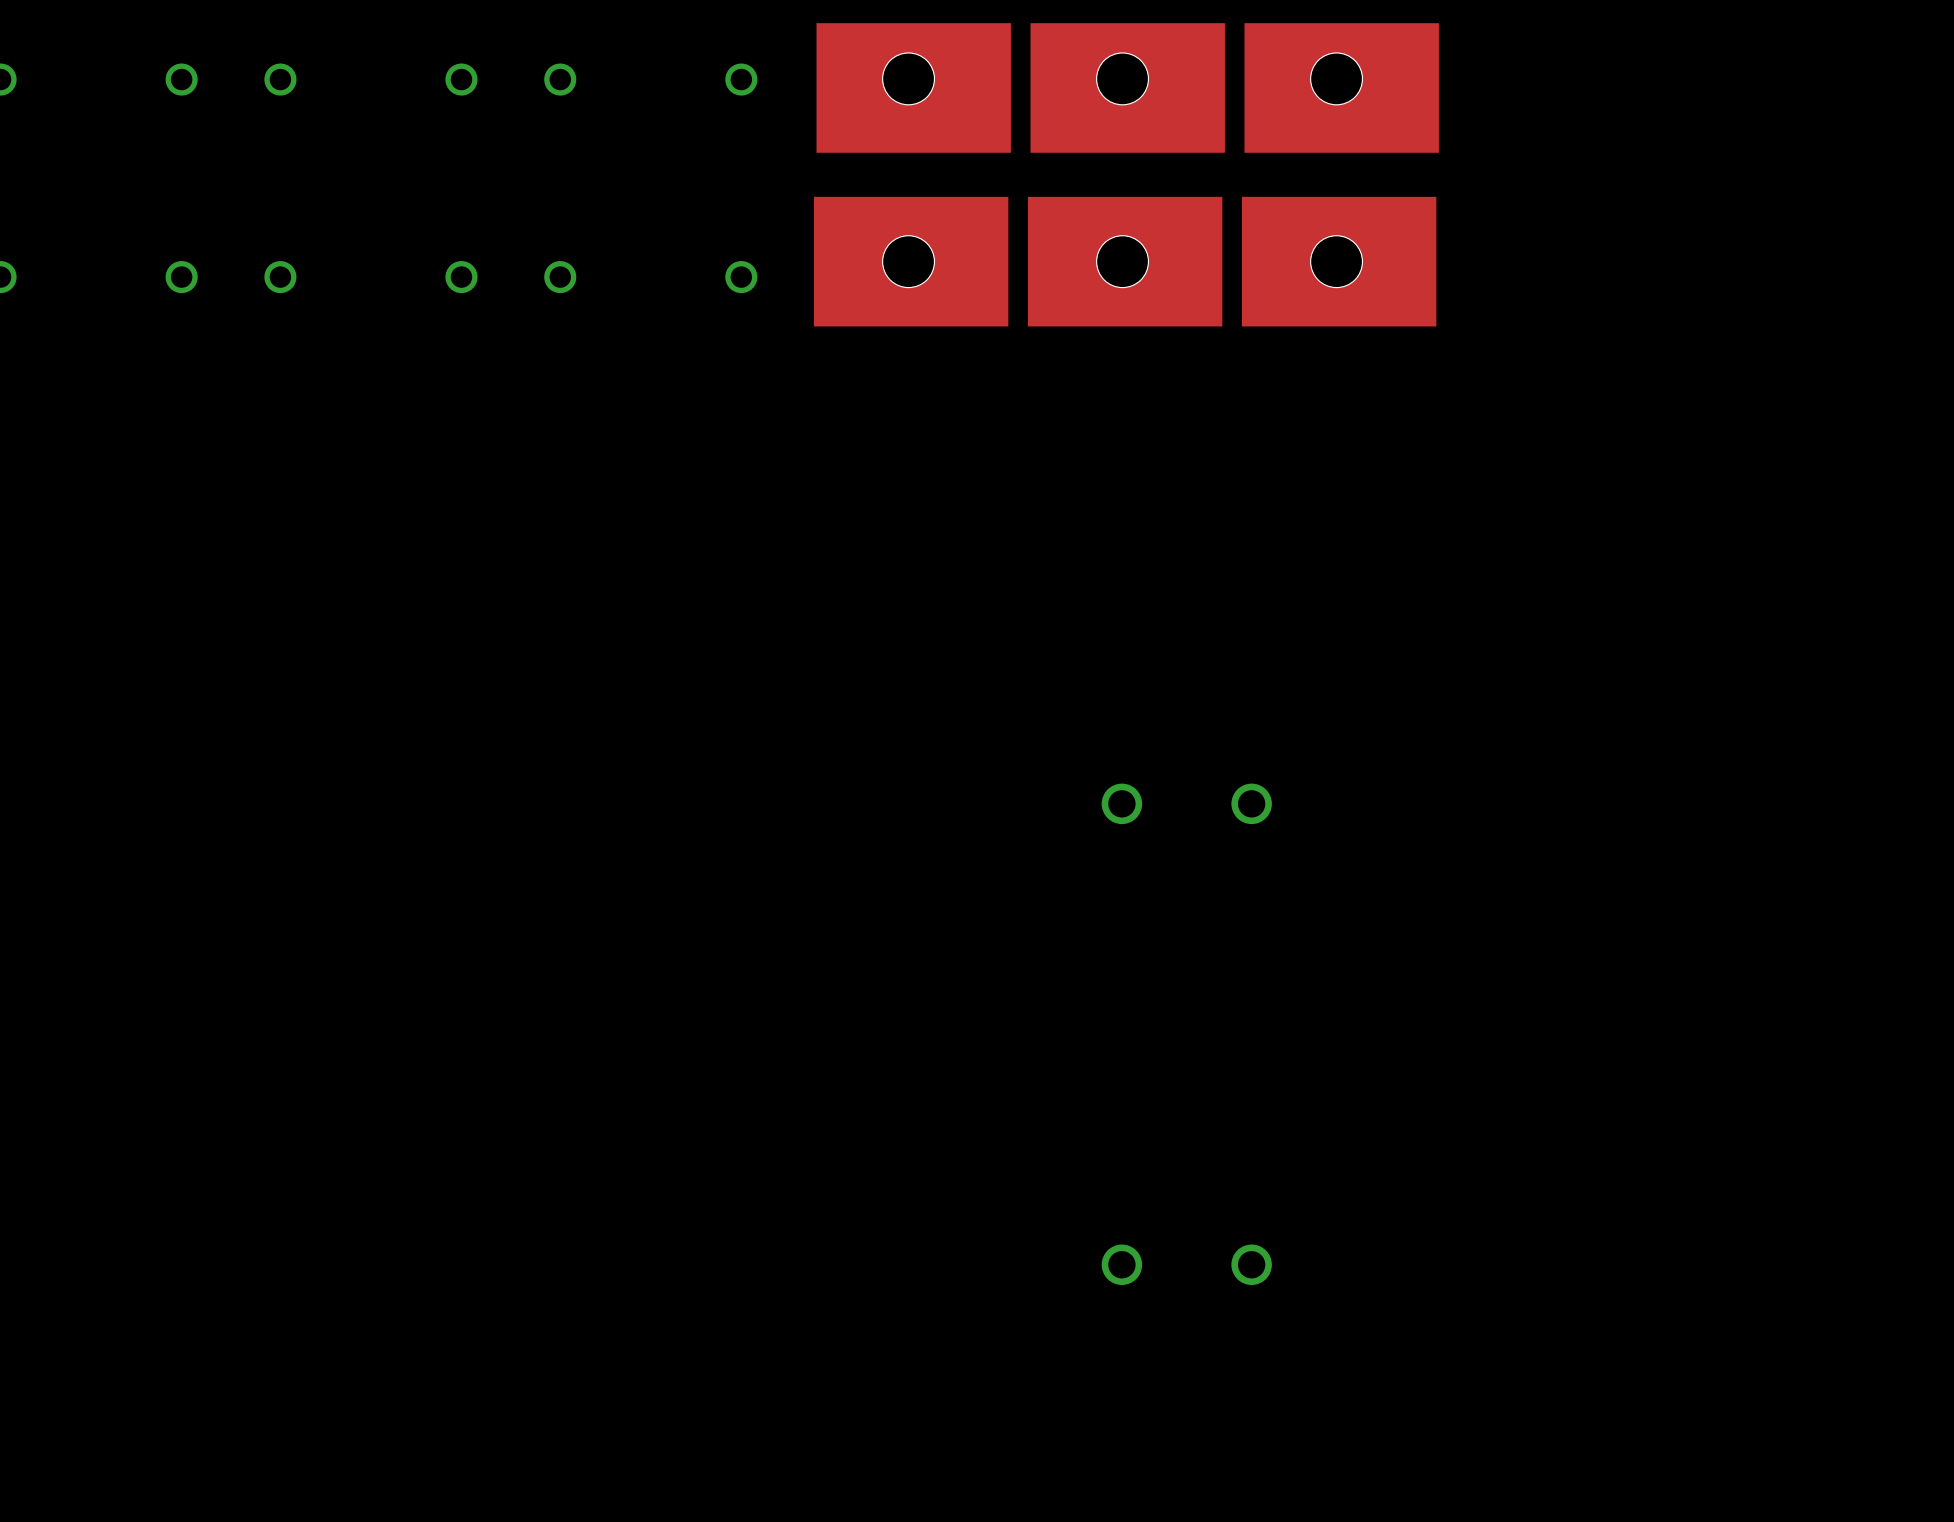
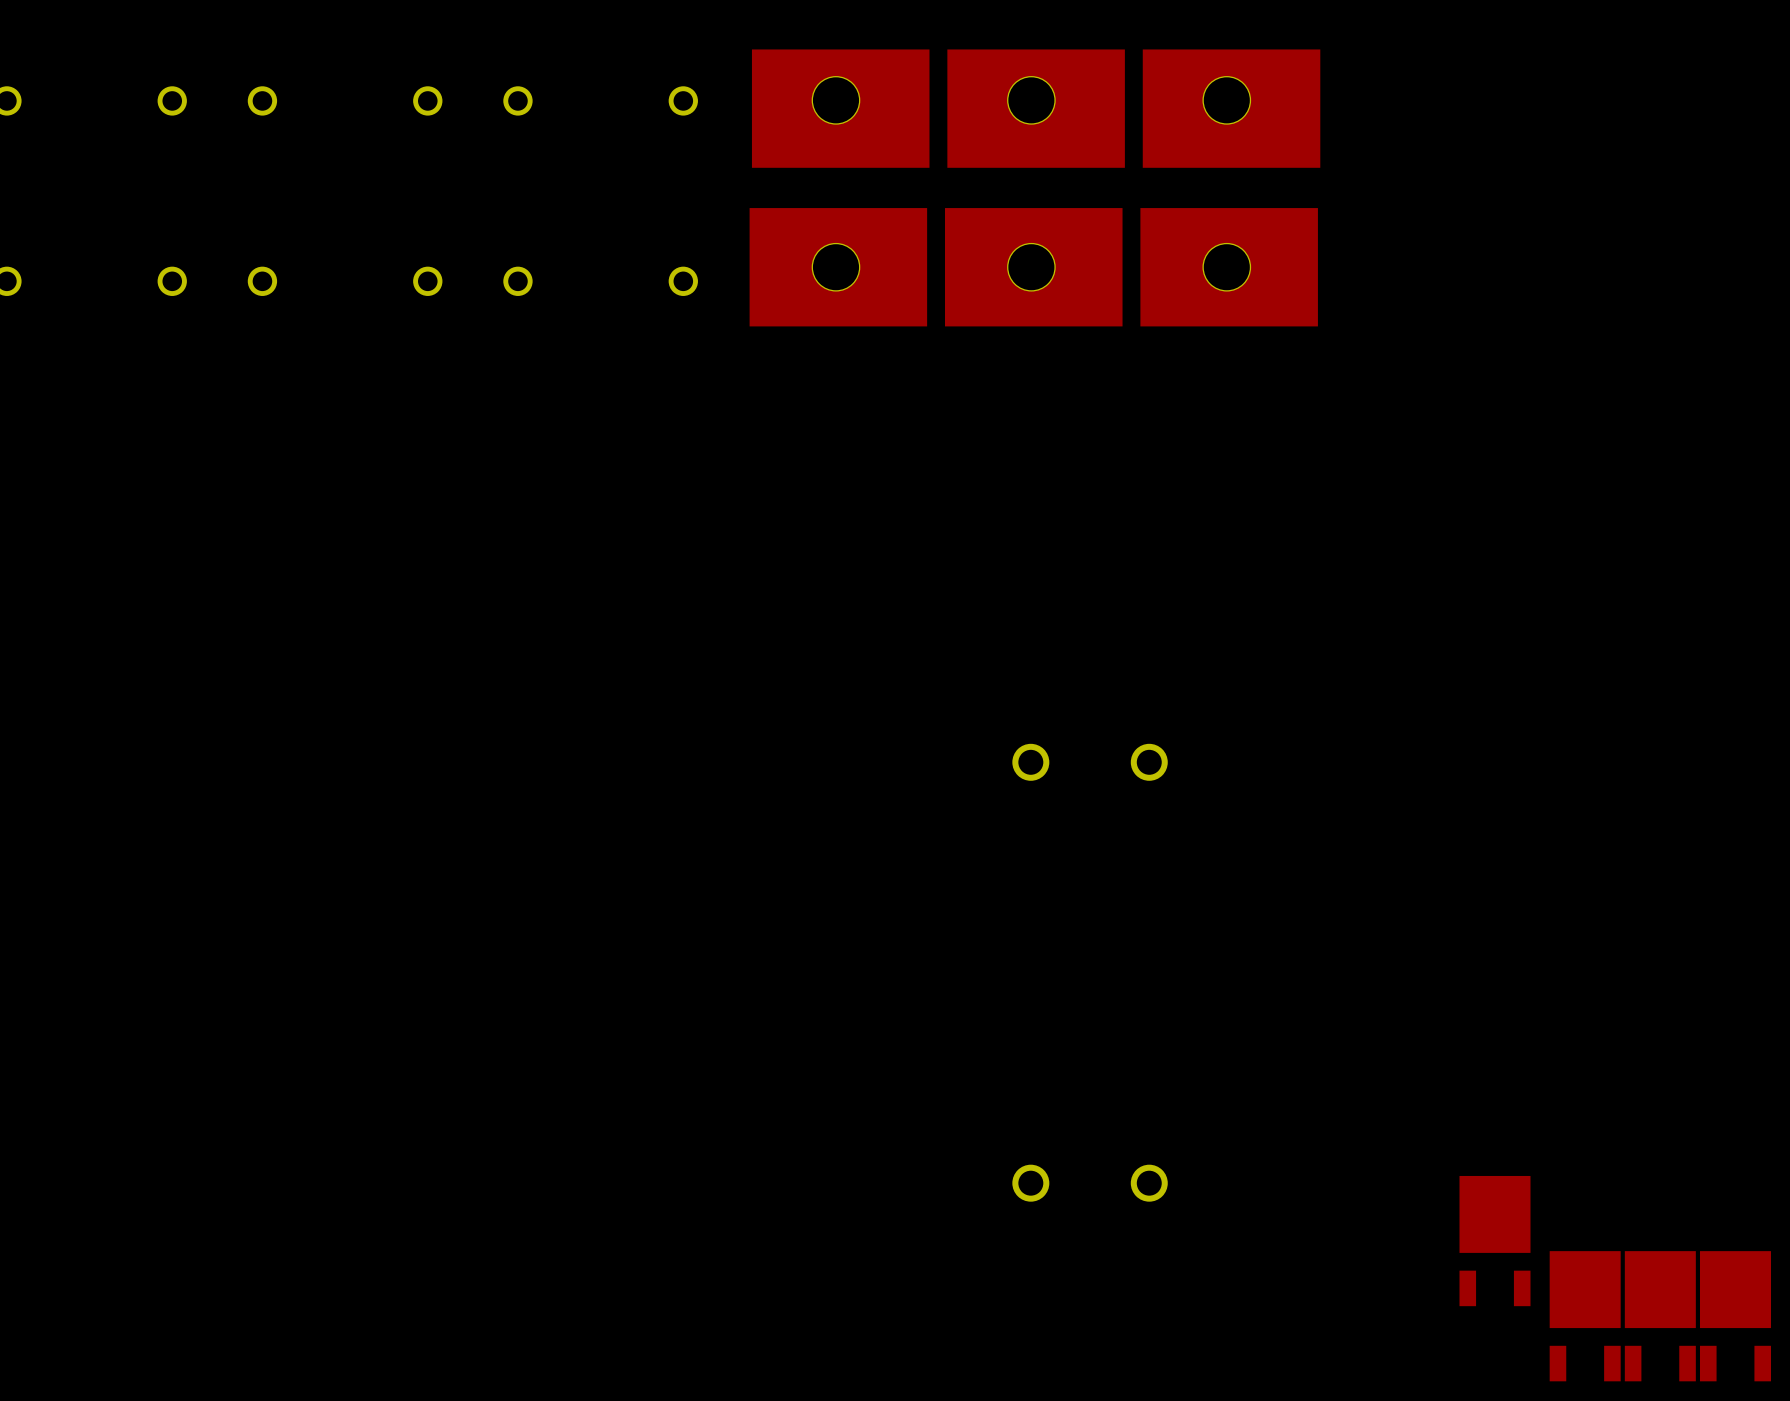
part: none -> (1494, 1241)
part: none -> (1585, 1316)
part: none -> (1660, 1316)
part: none -> (1735, 1316)

